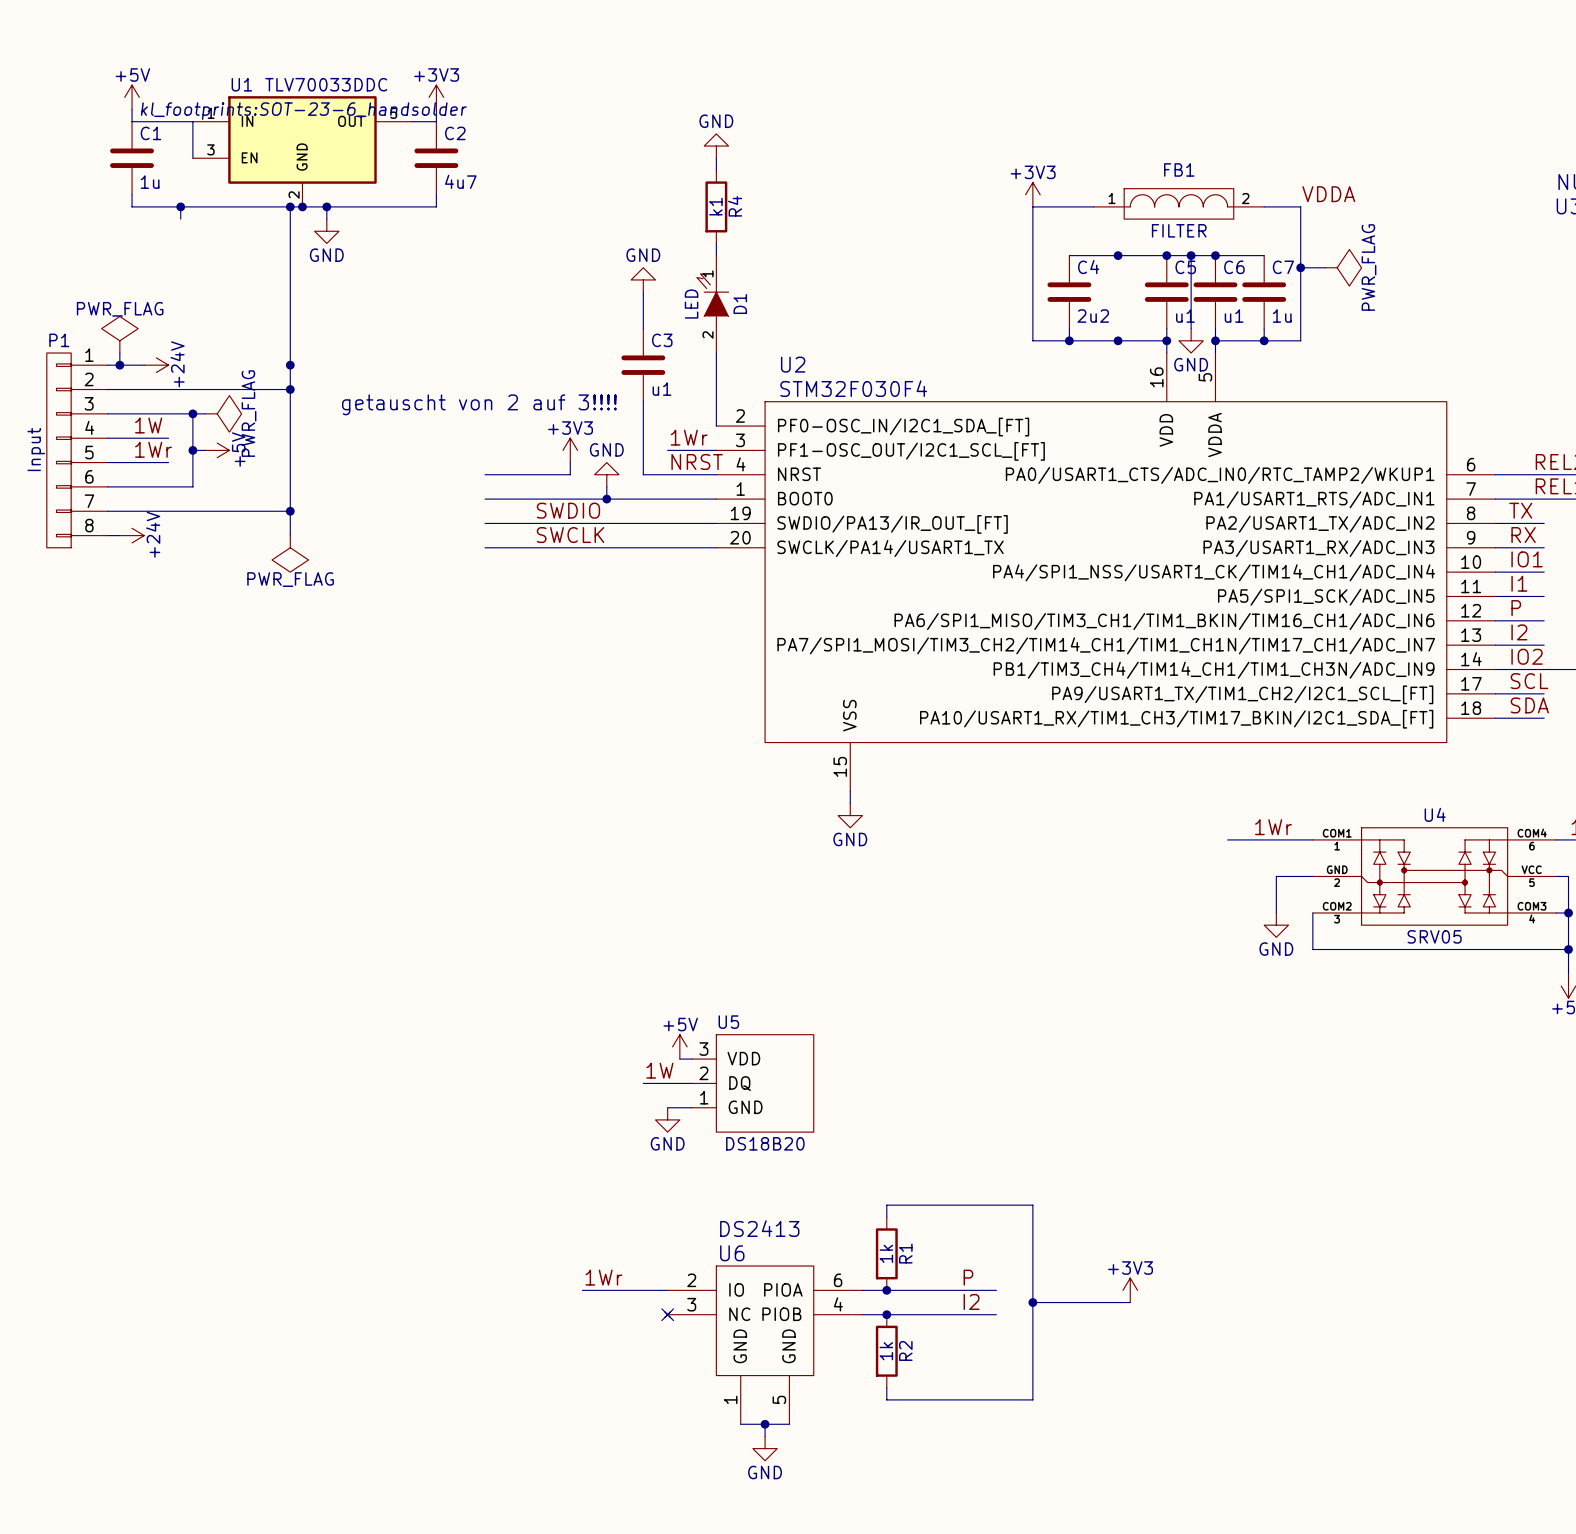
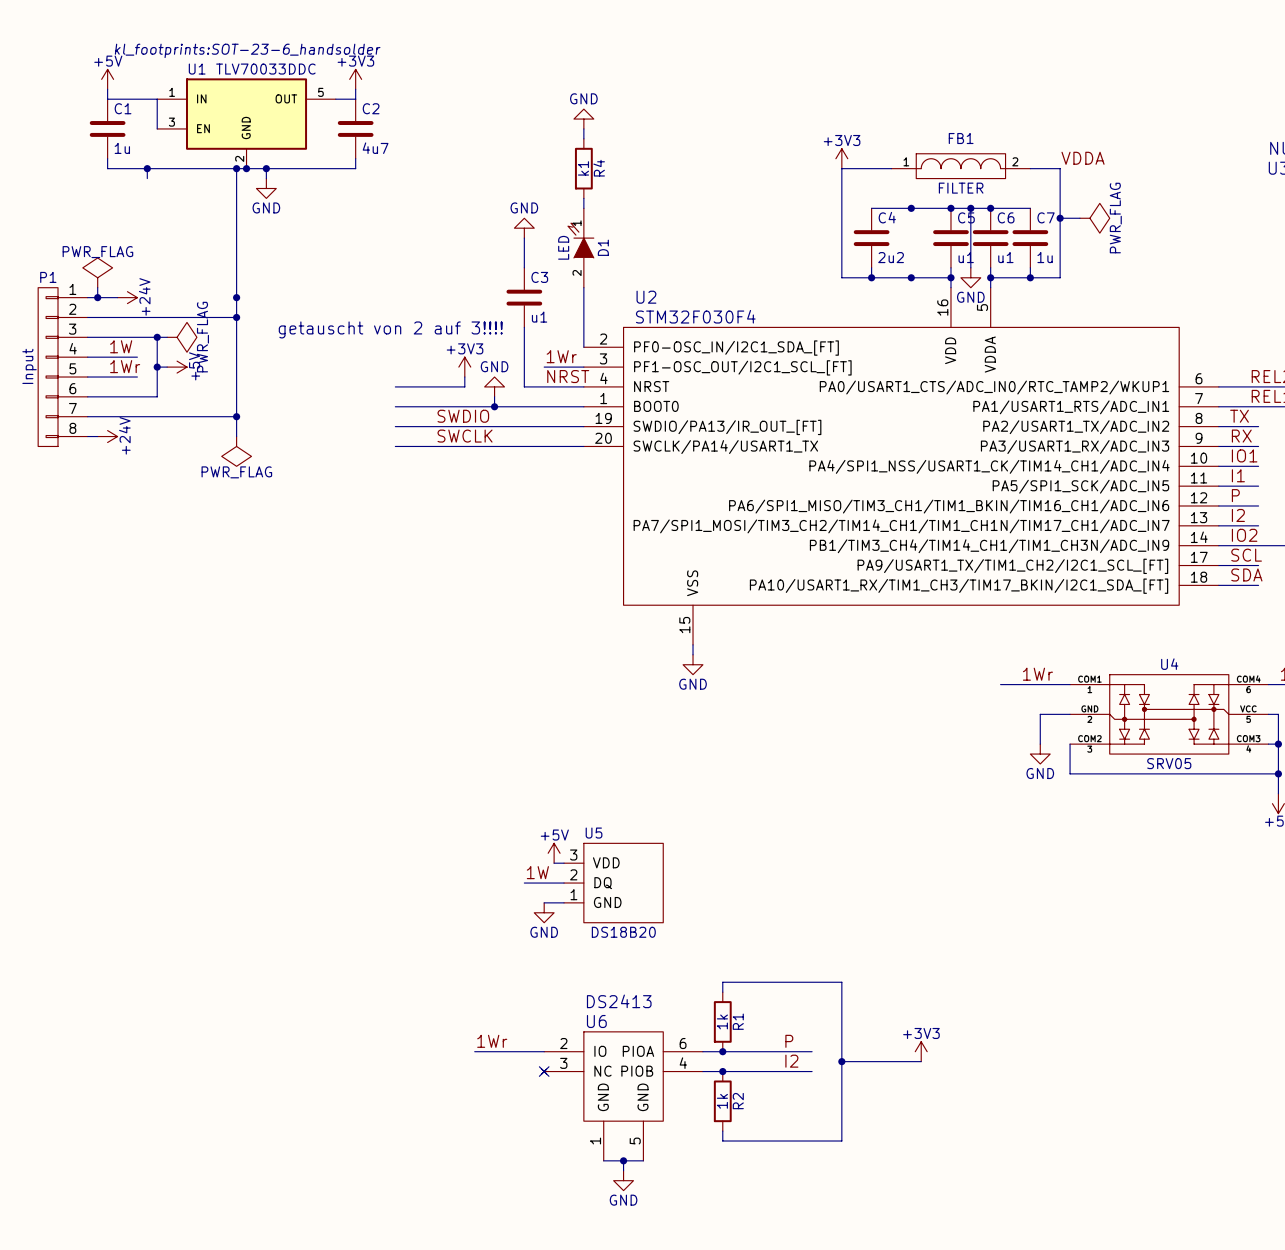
U1 text position: kl_footprints:SOT-23-6_handsolder (303, 111) -> kl_footprints:SOT-23-6_handsolder (247, 50)

